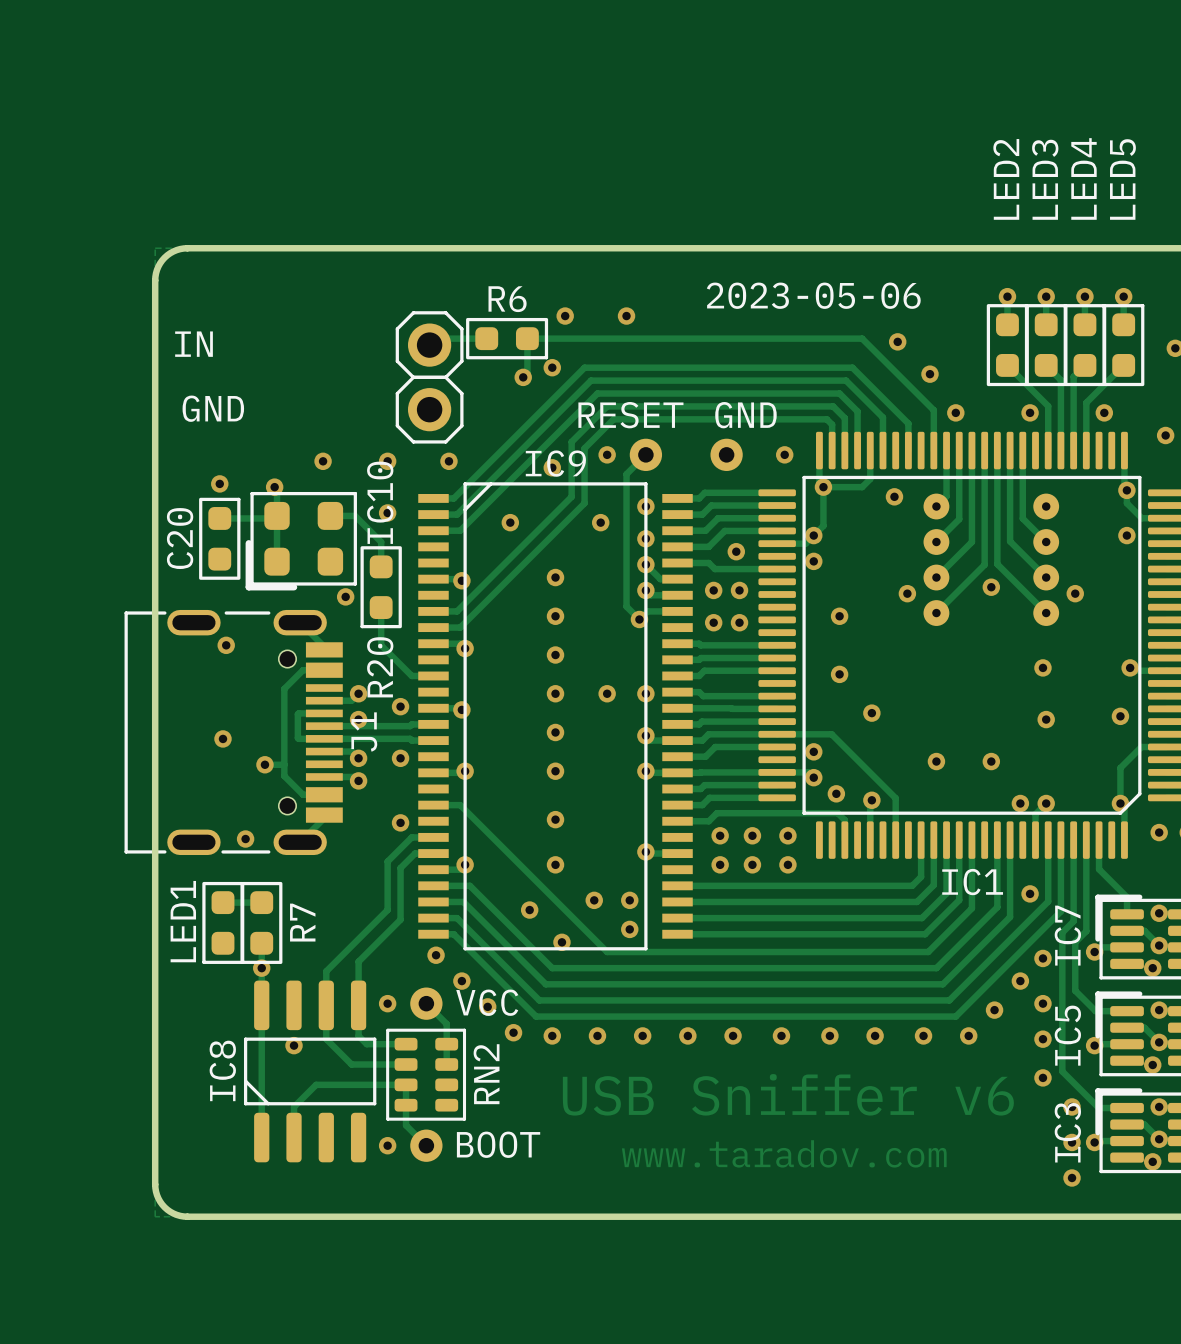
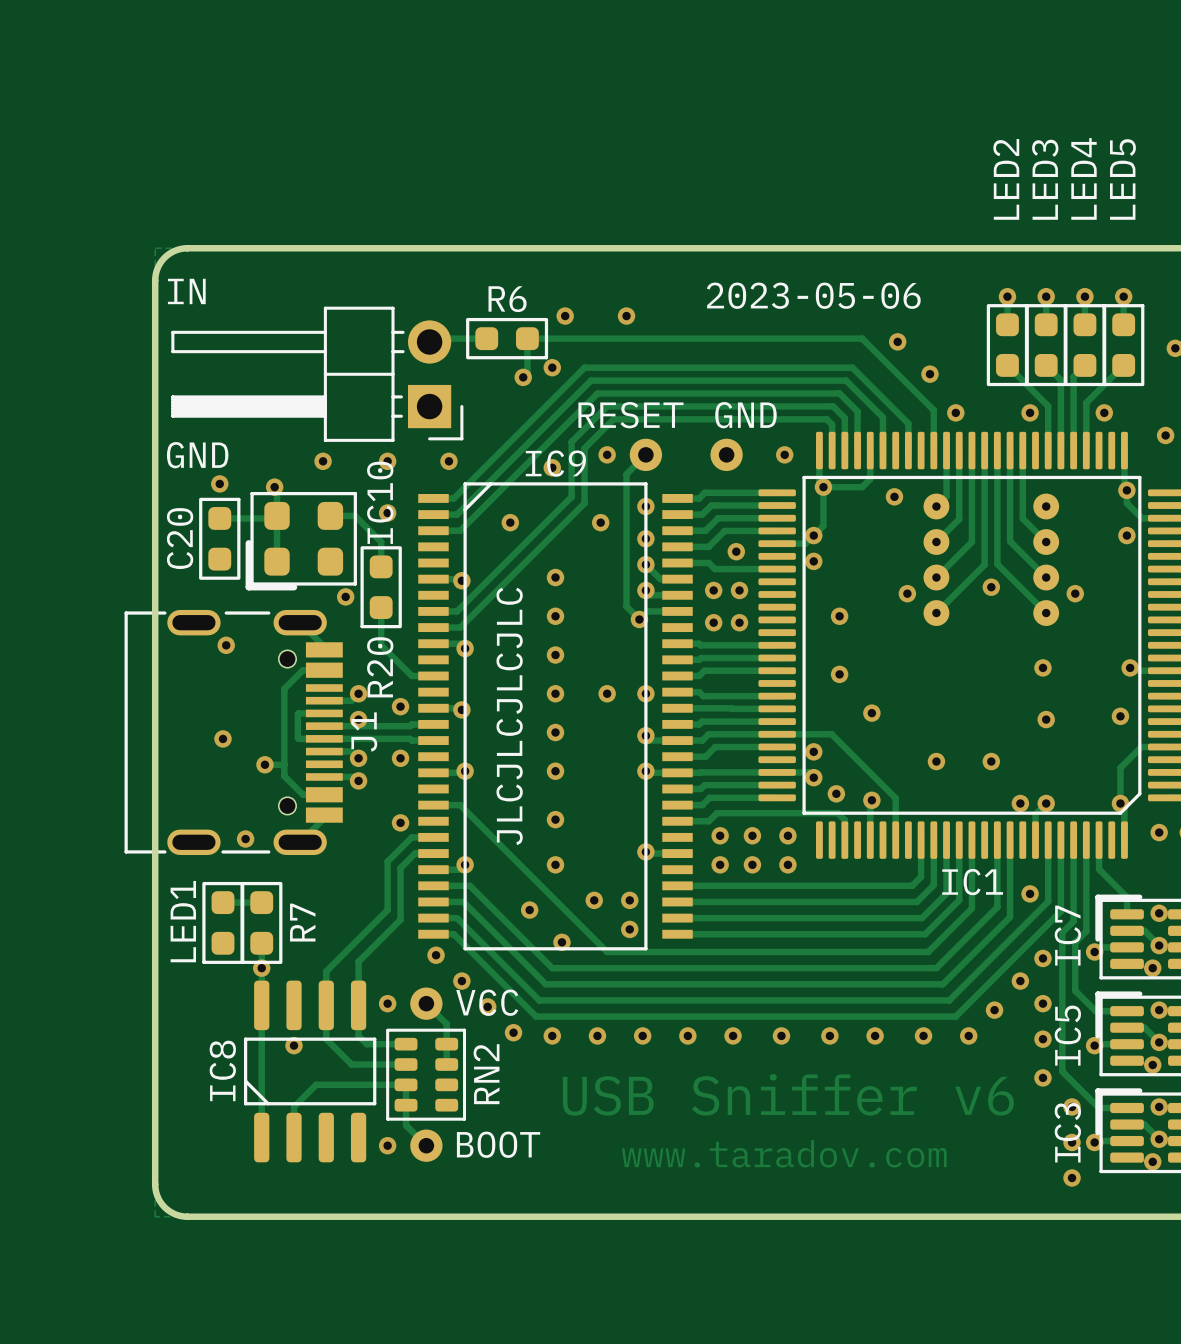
text: none -> IN (186, 291)
part: IN (429, 345) -> none
part: none -> (317, 374)
part: GND (429, 409) -> none
text: none -> GND (197, 455)
text: none -> JLCJLCJLCJLC (509, 716)

